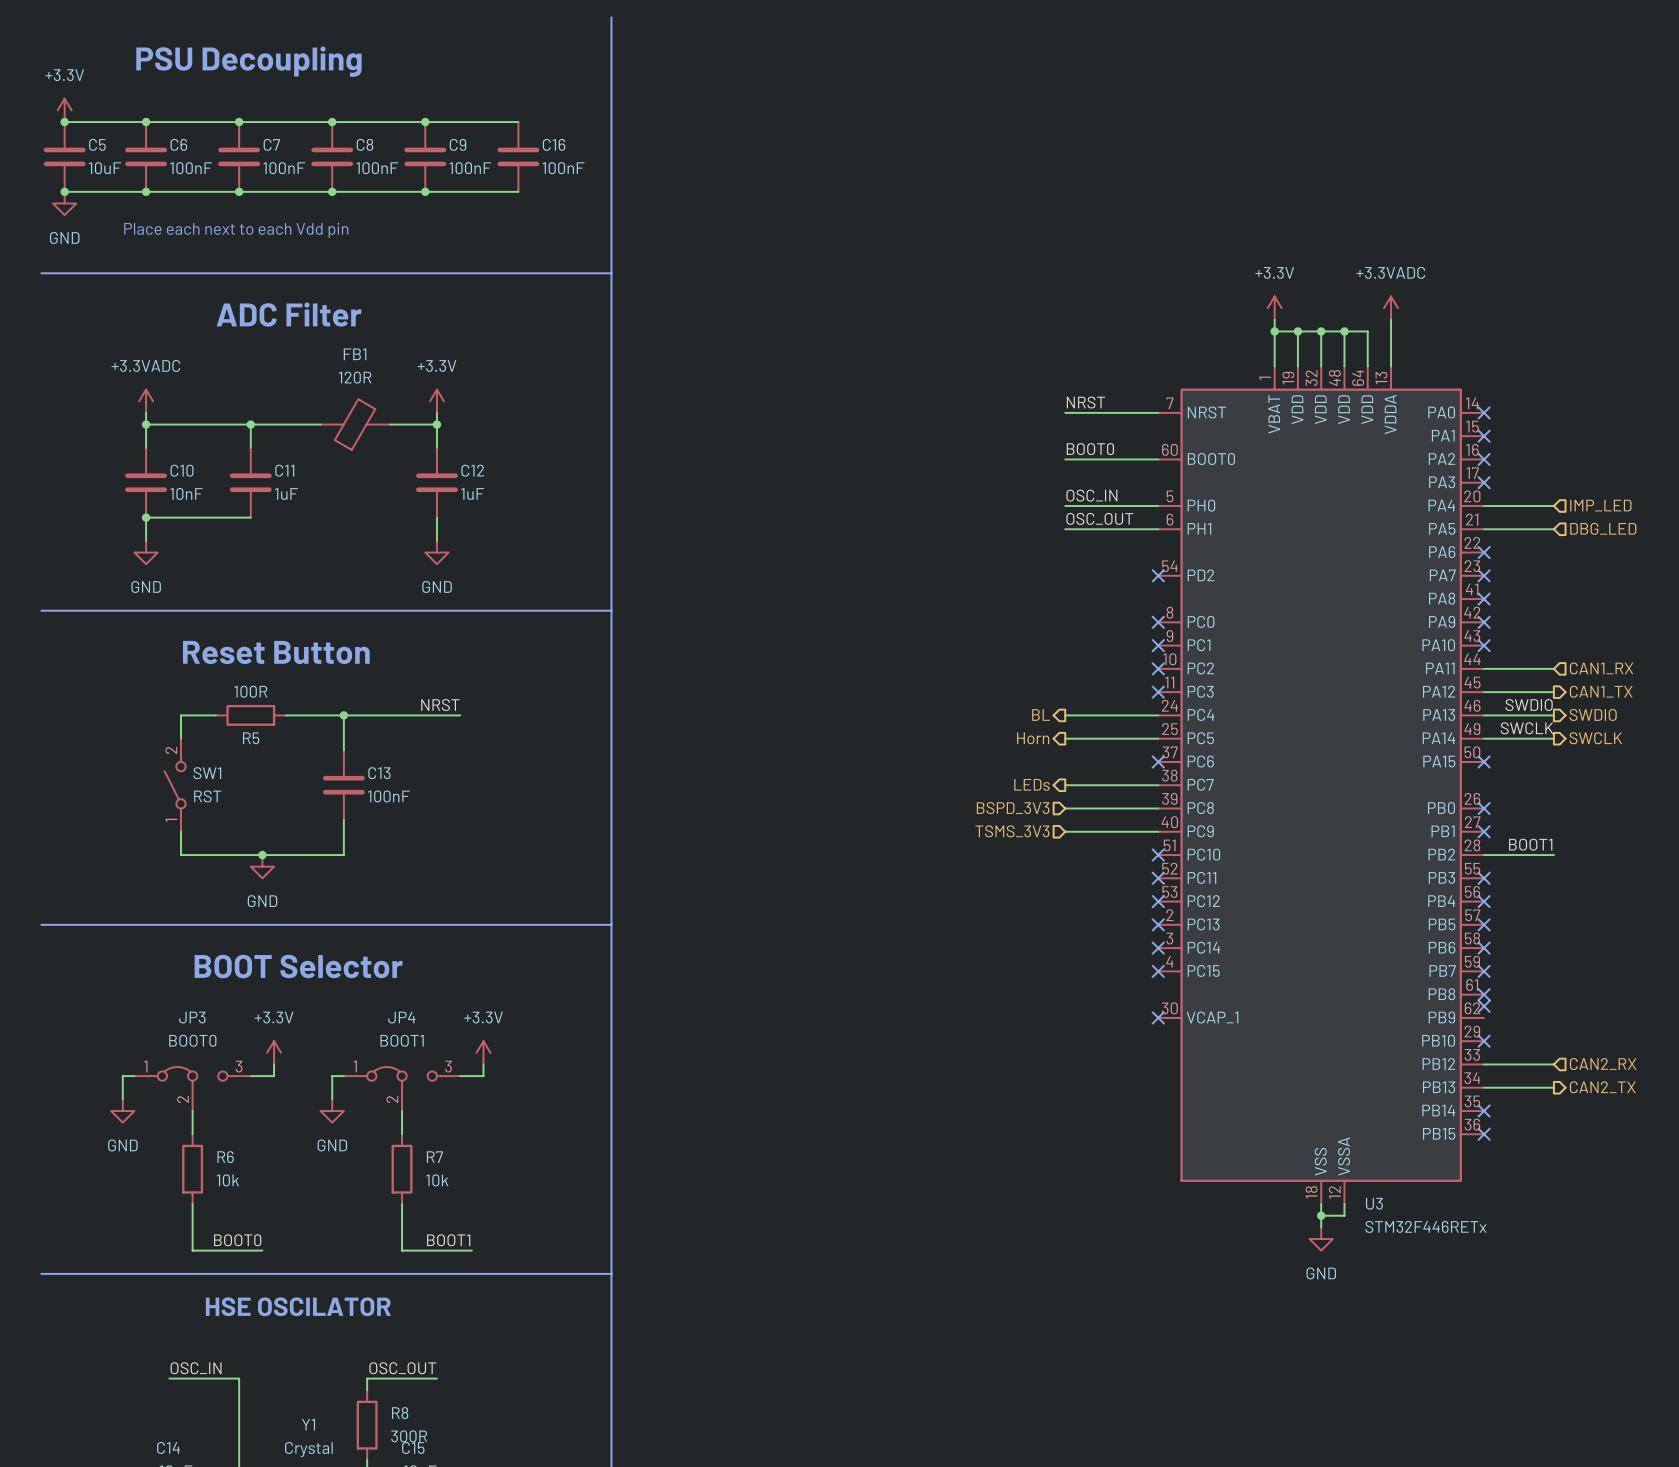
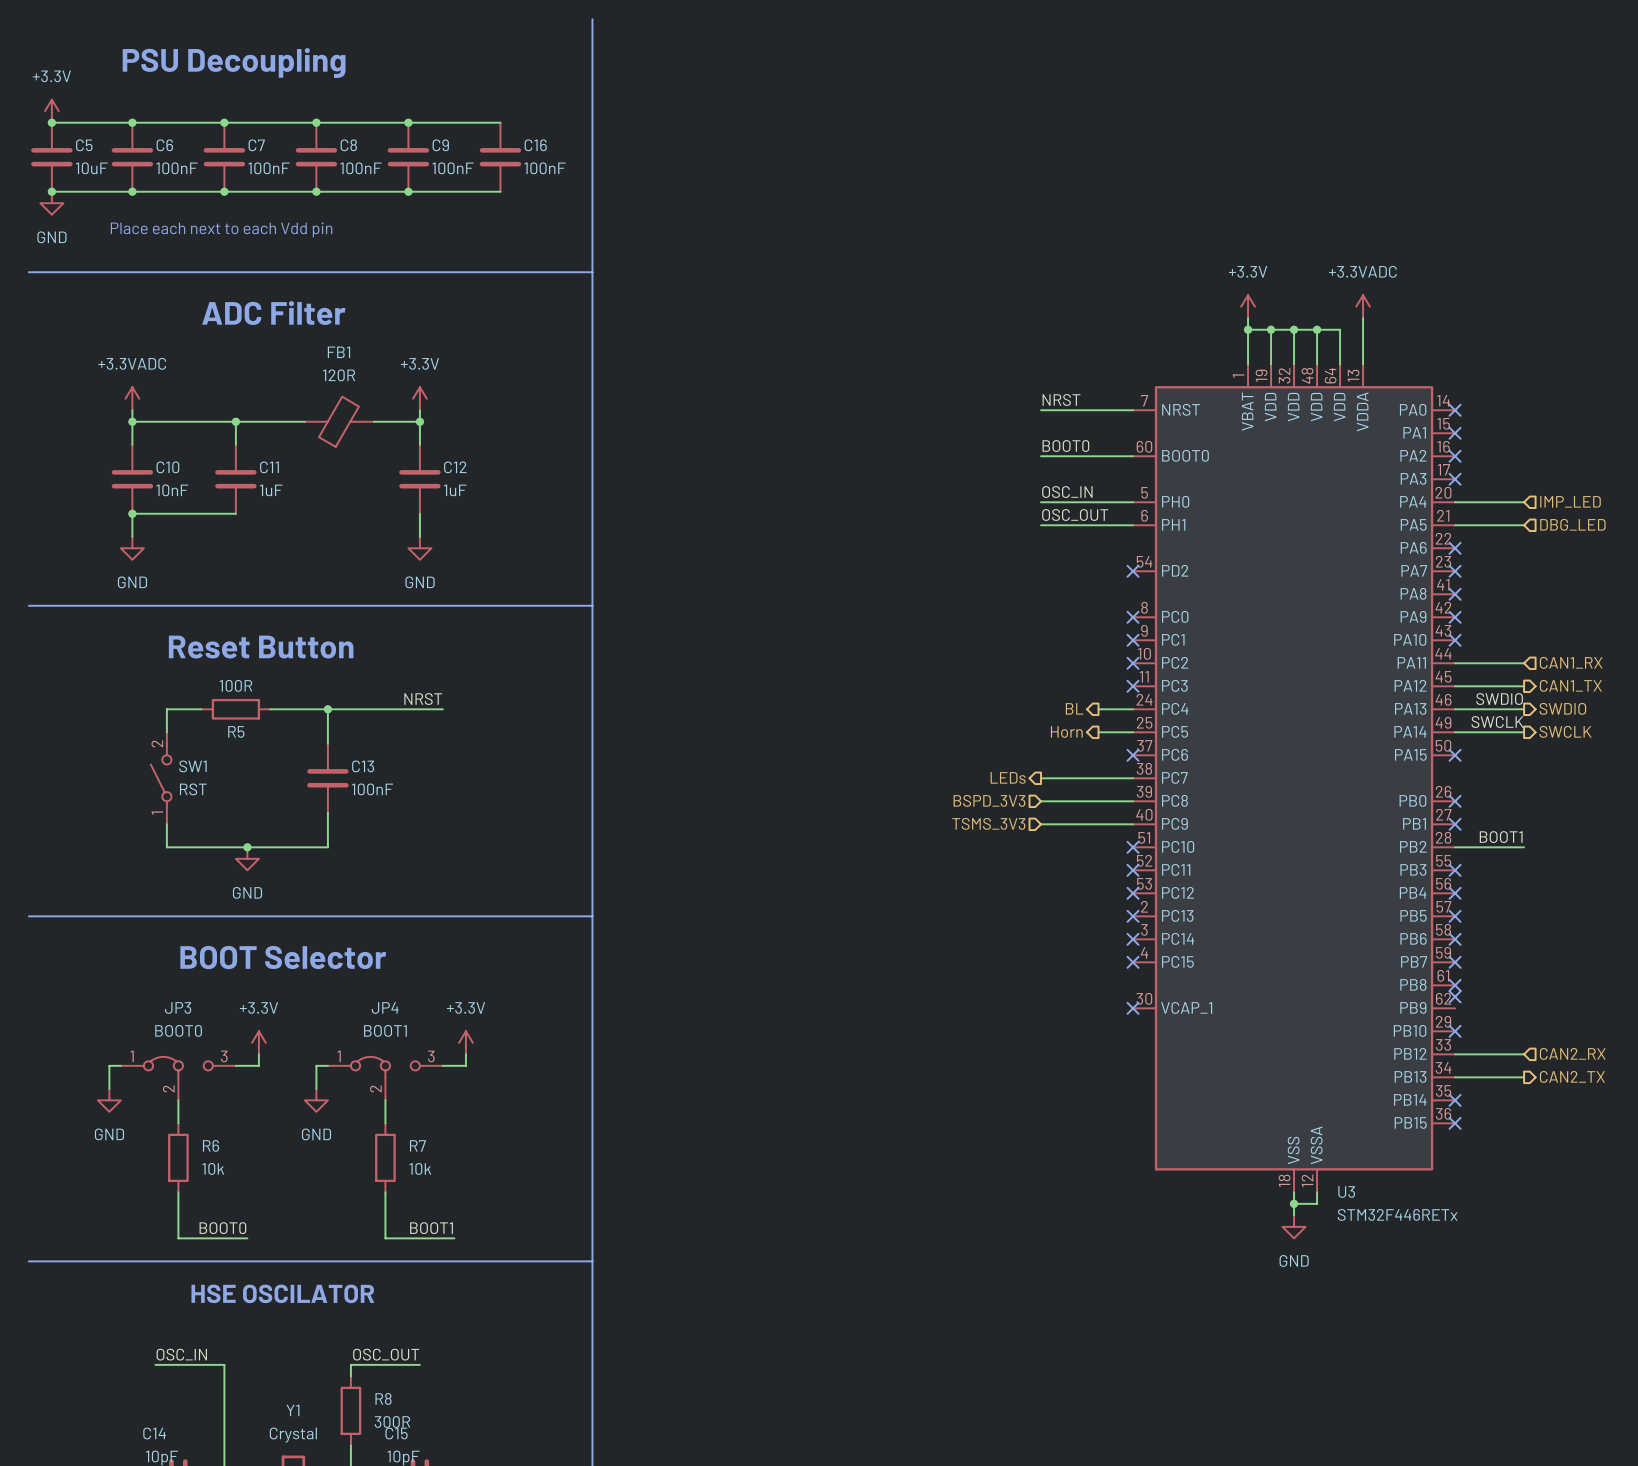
hierarchical label position: BL (1041, 714) -> BL (1074, 708)
wire: (1065, 715) (1123, 715) -> none
hierarchical label position: Horn (1033, 738) -> Horn (1066, 731)
wire: (1065, 738) (1123, 738) -> none

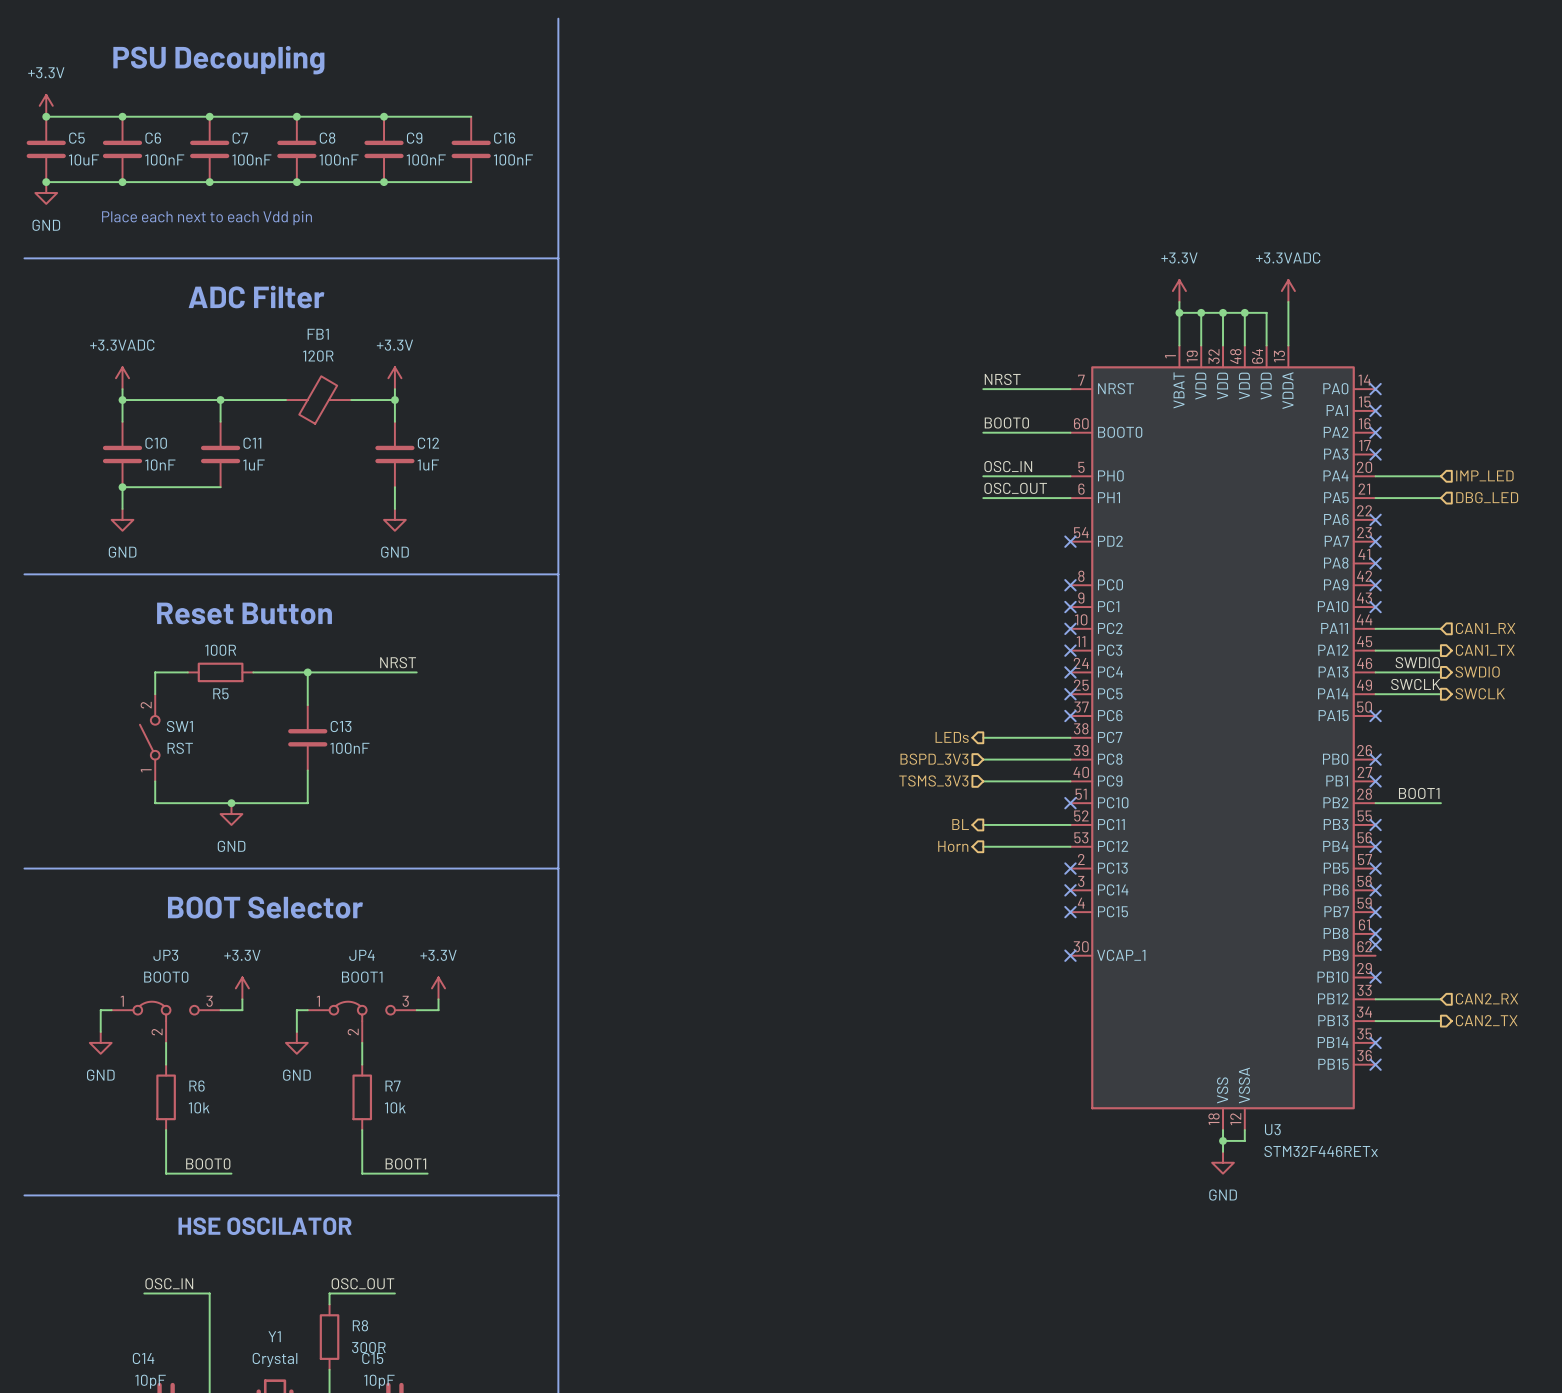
hierarchical label position: BL (1074, 708) -> BL (960, 824)
wire: (1098, 709) (1133, 709) -> none
no-connect mark: none -> (1070, 672)
hierarchical label position: Horn (1066, 731) -> Horn (953, 846)
wire: (1098, 732) (1133, 732) -> none
no-connect mark: none -> (1070, 694)
wire: none -> (983, 824) (1070, 824)
no-connect mark: (1133, 870) -> none
wire: none -> (983, 846) (1070, 846)
no-connect mark: (1133, 893) -> none

